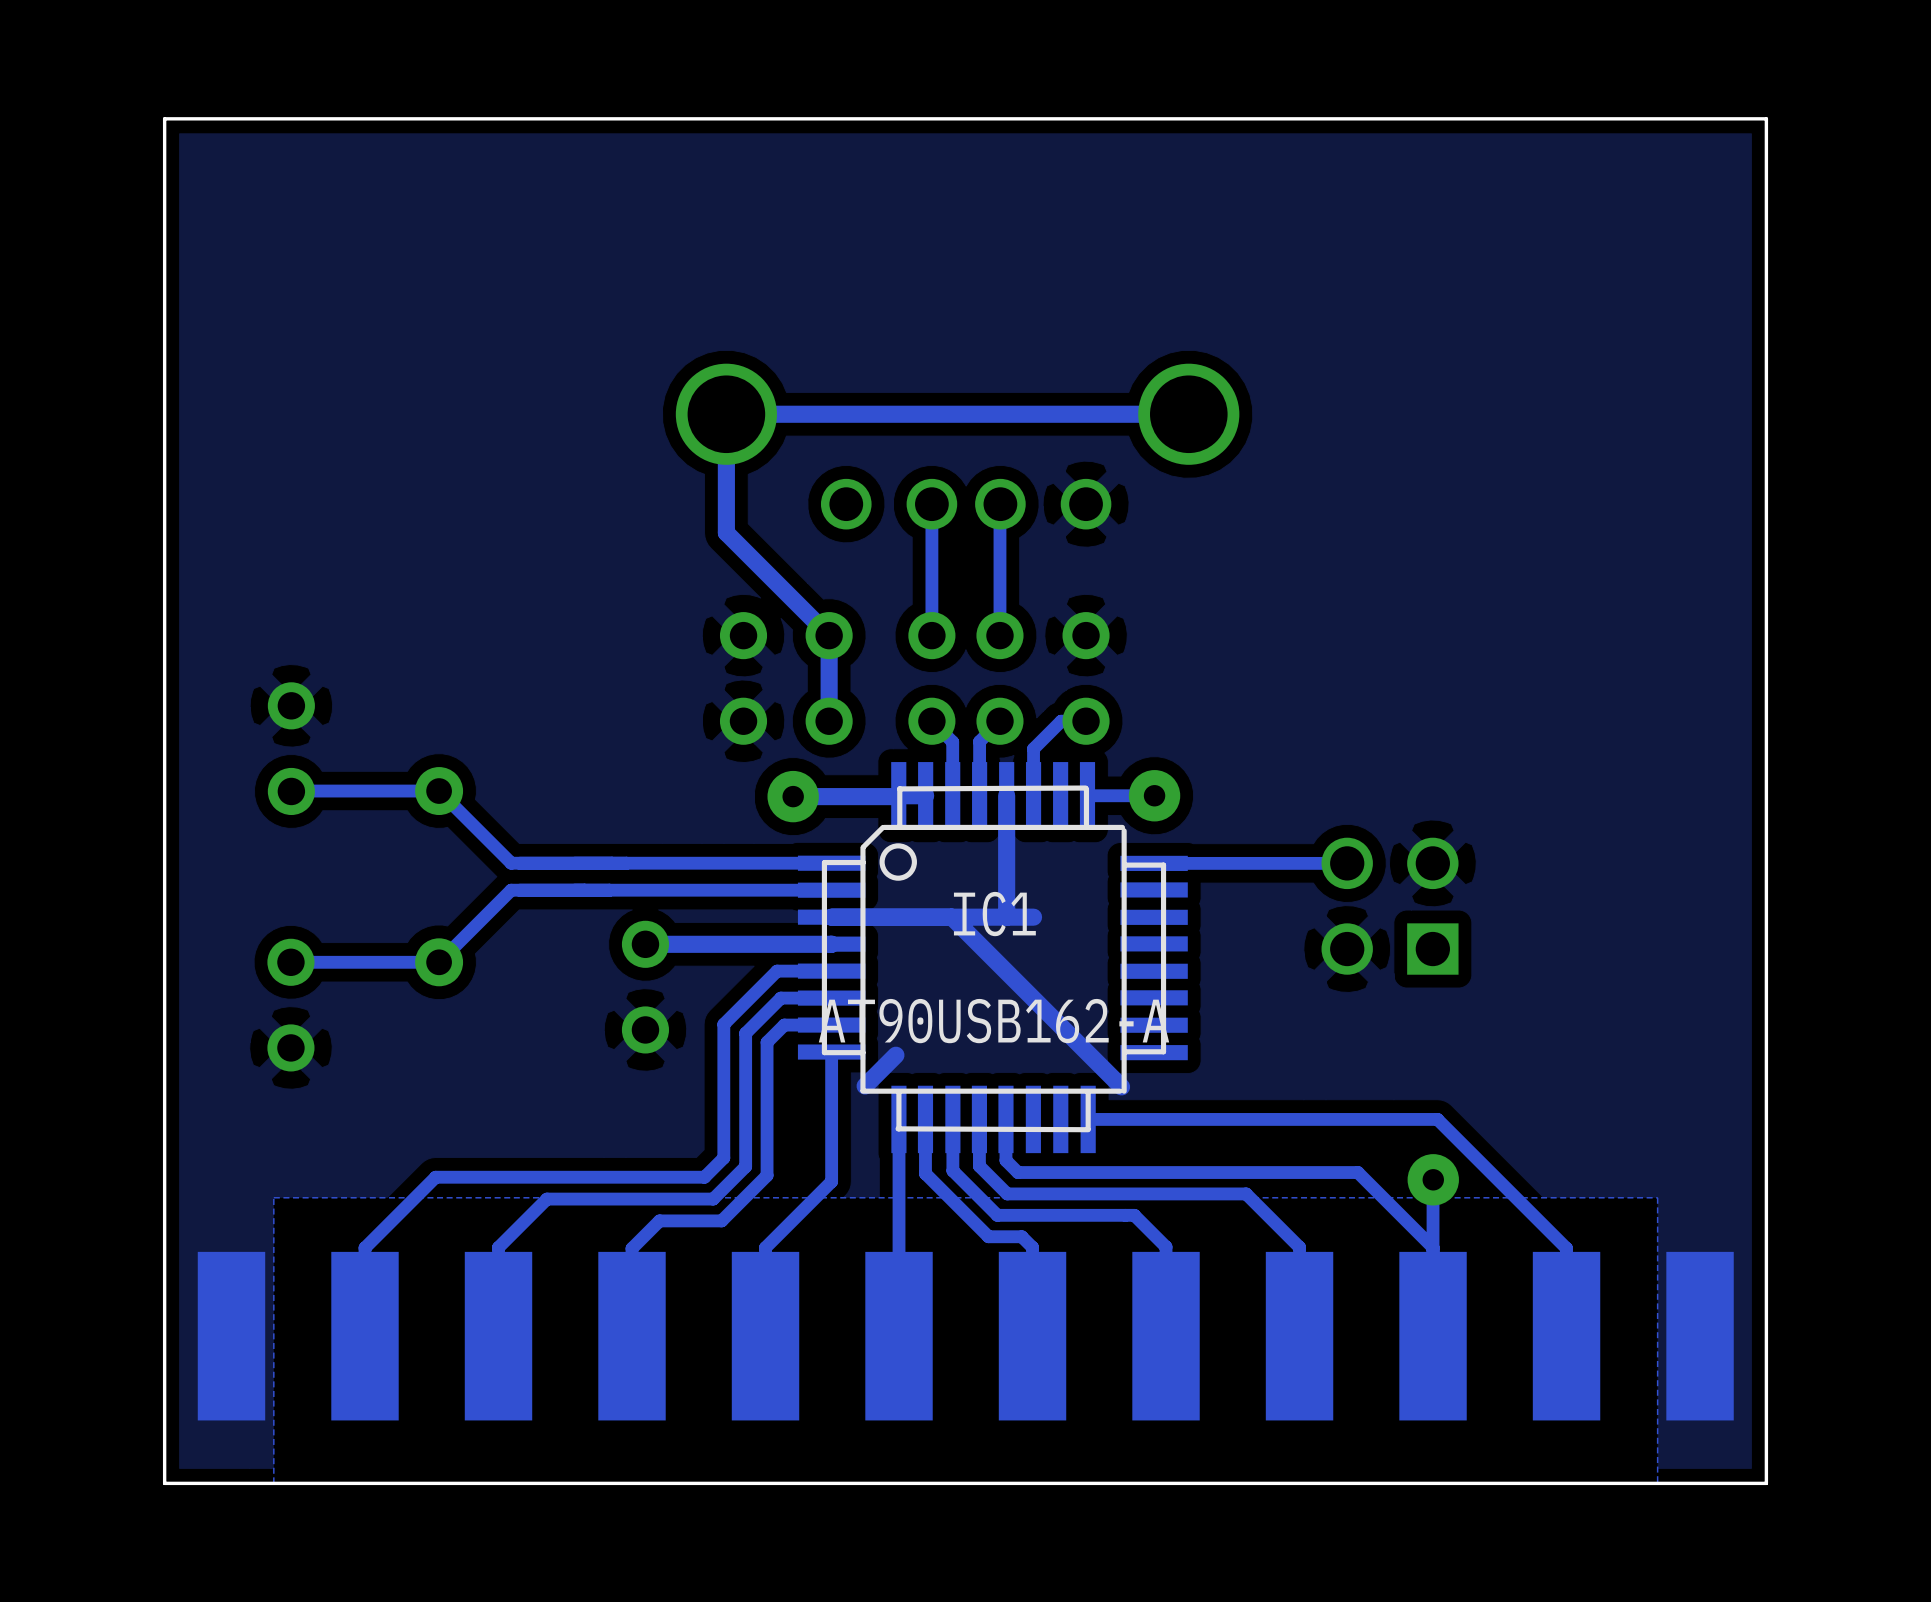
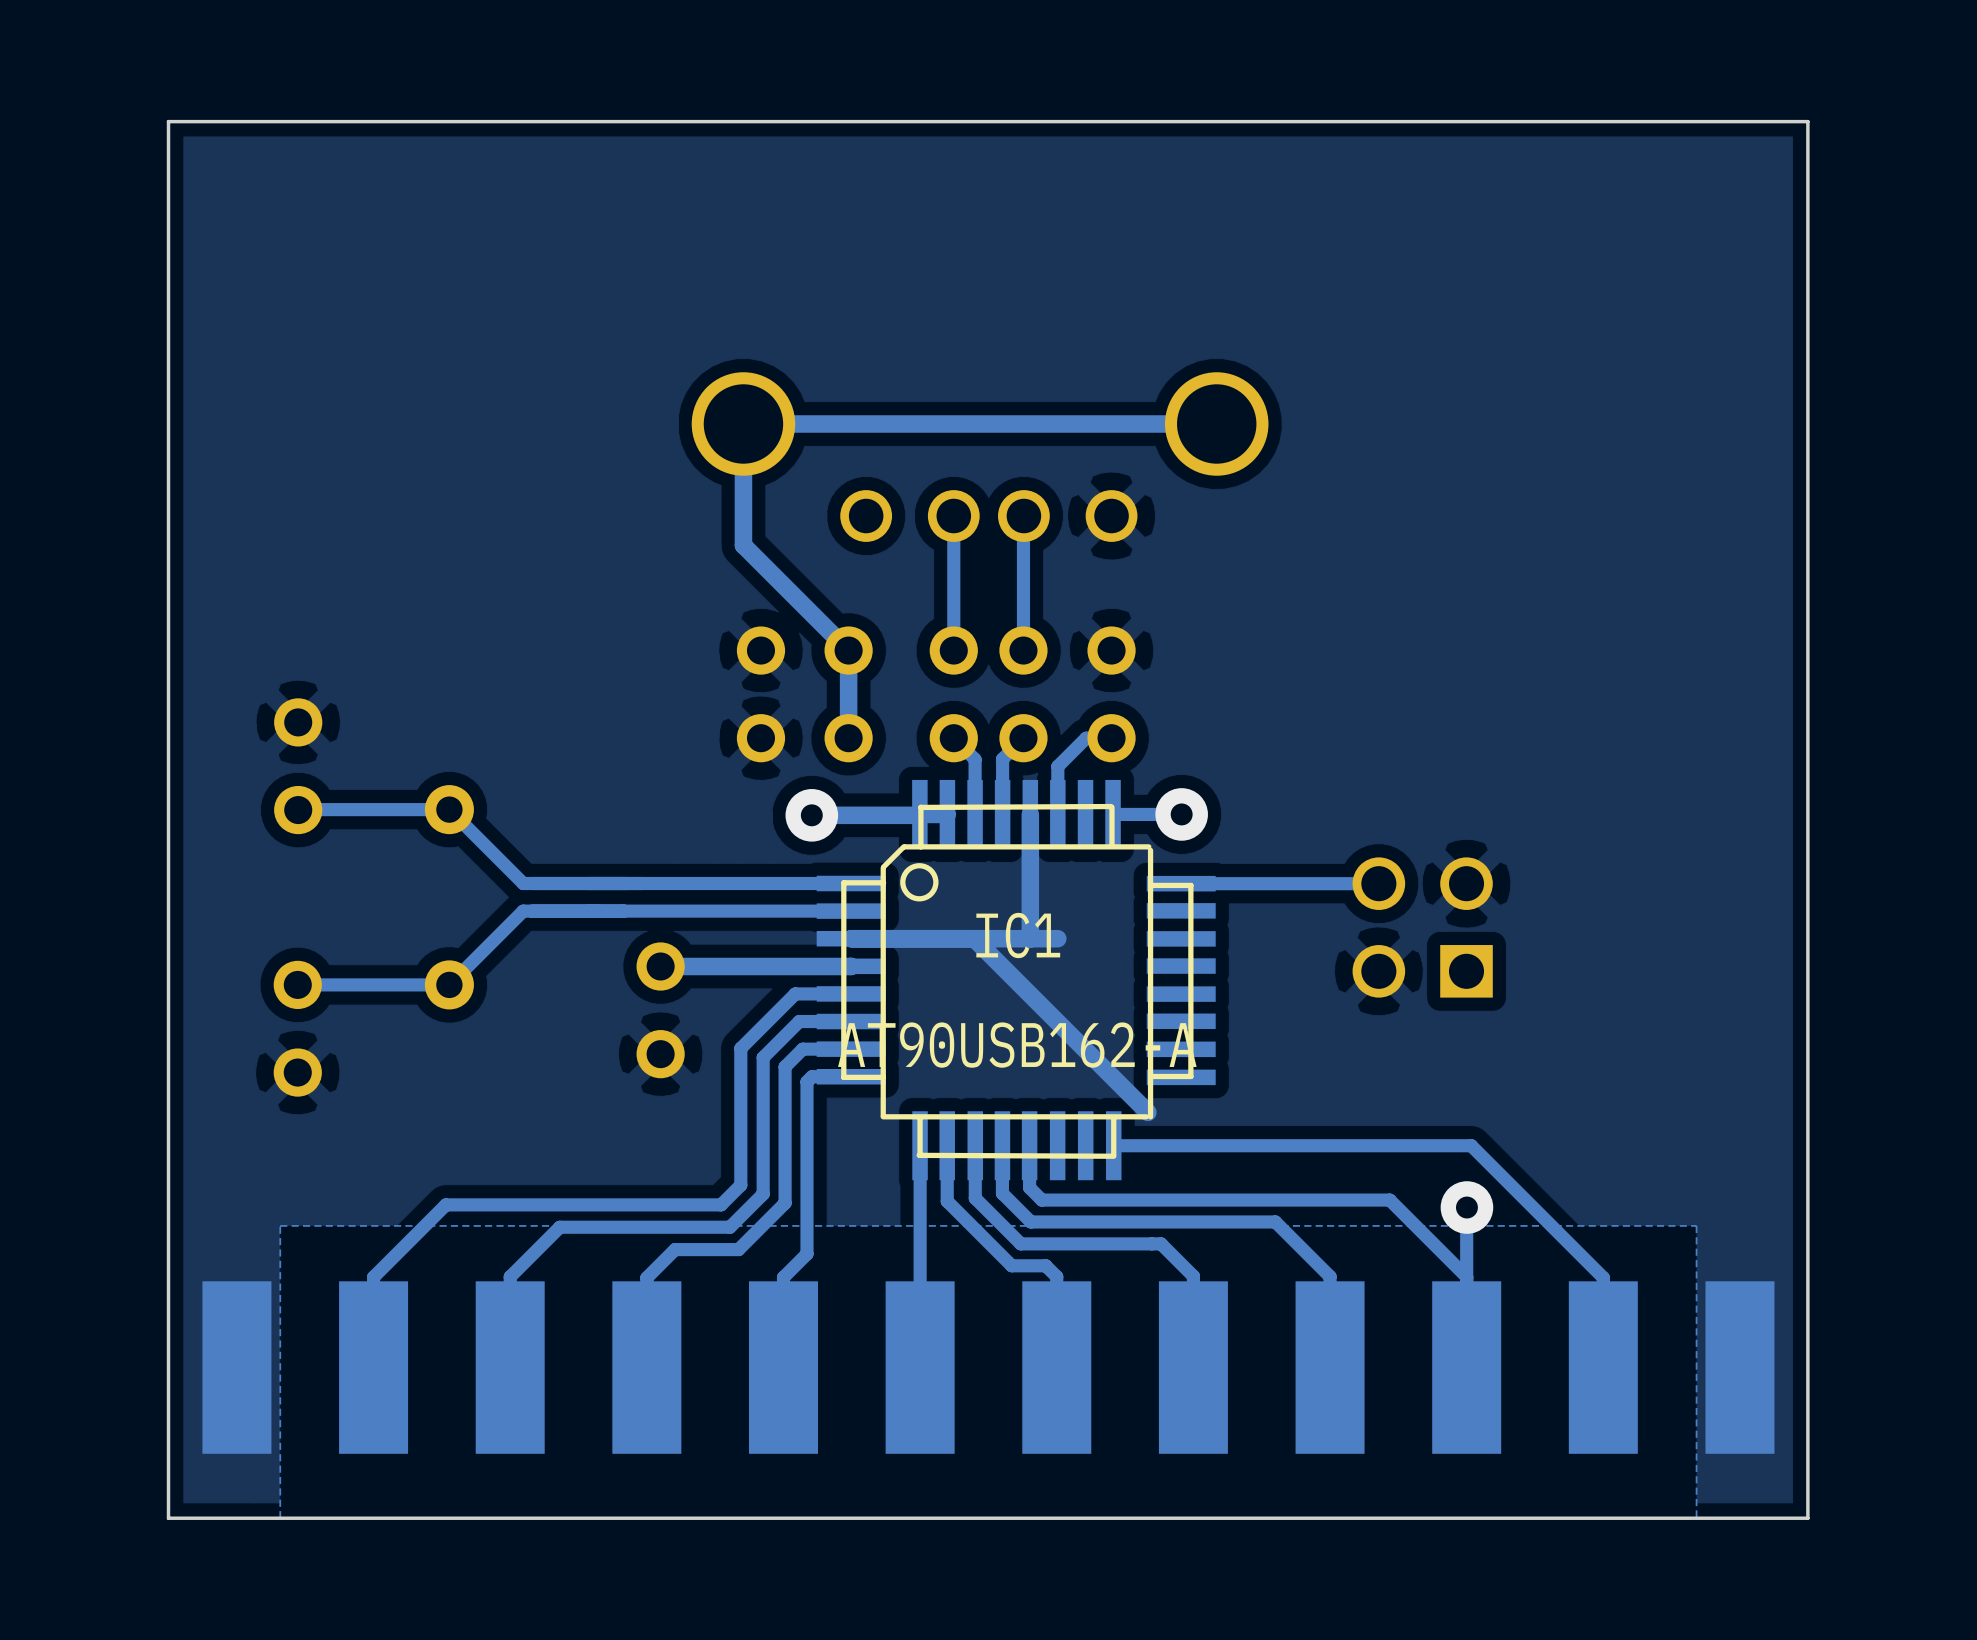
track: (831, 1052) (831, 1181) (765, 1247) -> (851, 1076) (811, 1076) (806, 1081) (806, 1253) (783, 1277)
track: (895, 1055) (865, 1086) -> none

